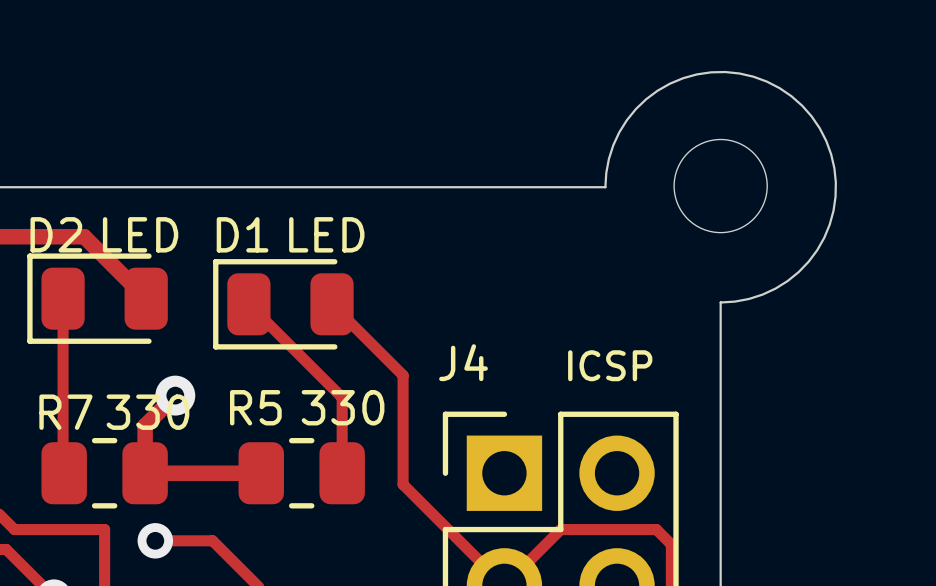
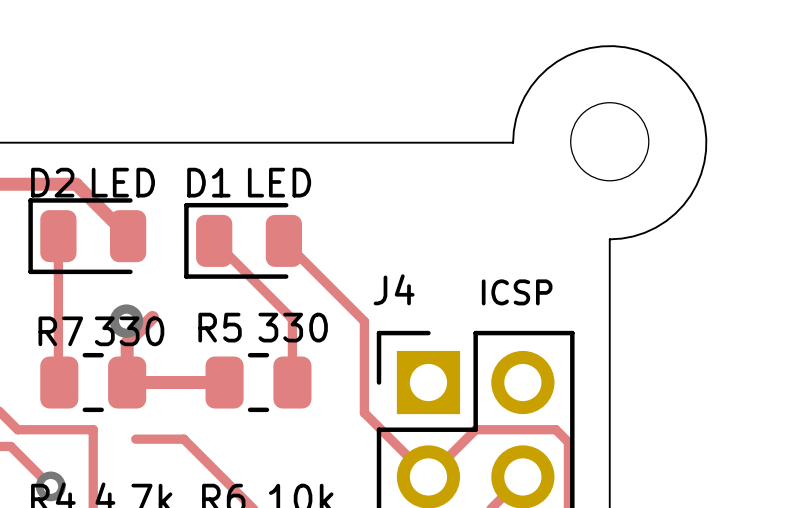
track: (403, 375) (403, 484) (428, 509) -> (343, 300) (364, 321) (364, 412)
via position: (175, 395) -> (126, 321)
via: (155, 540) -> none

